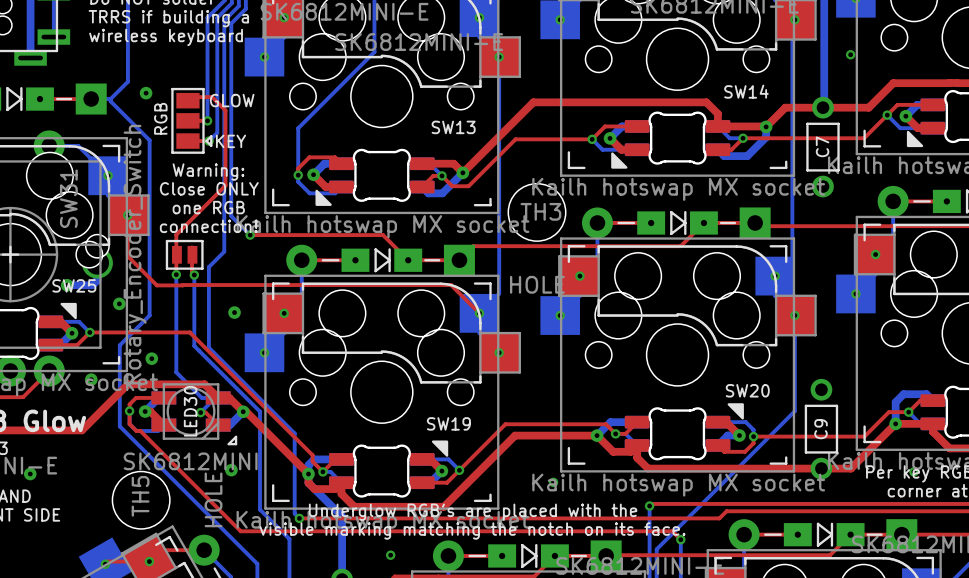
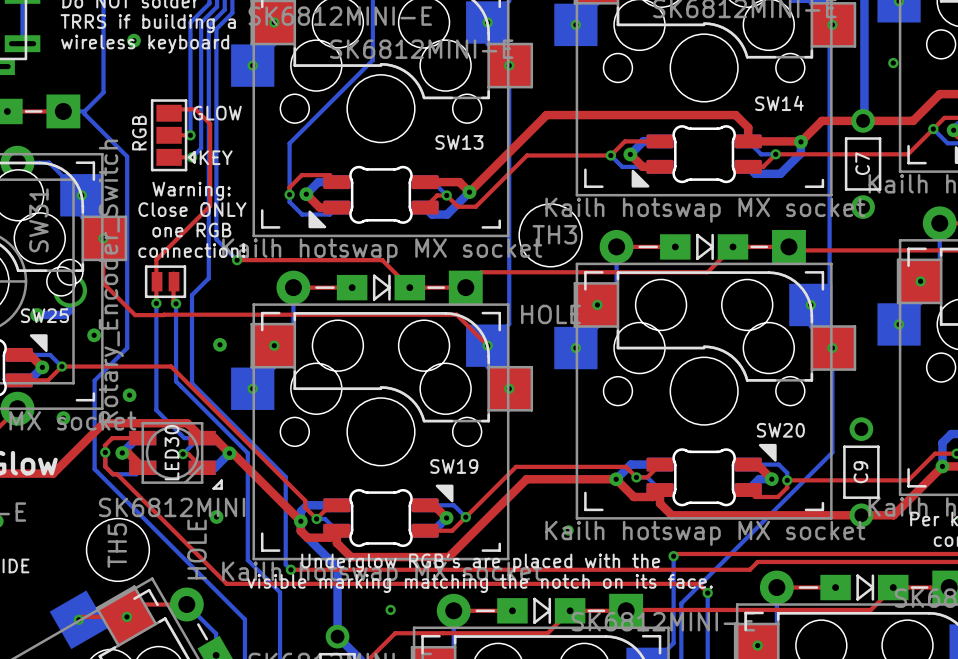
via position: (146, 93) -> (133, 40)

